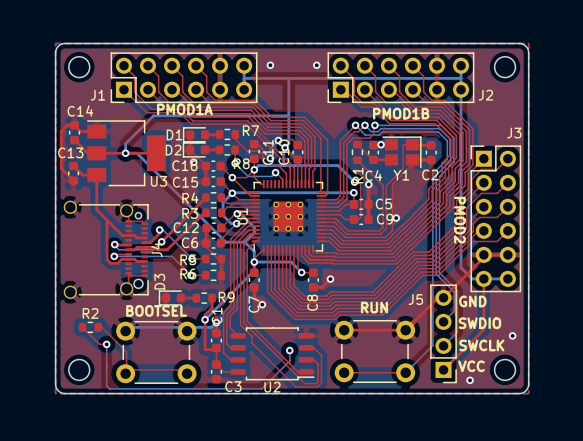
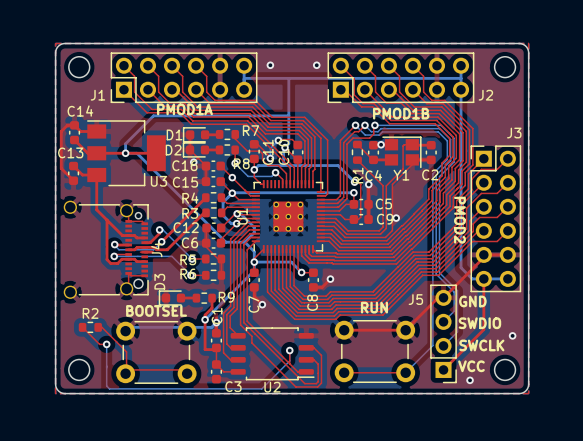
top track: (254, 169) (246, 177) (232, 177) -> none

